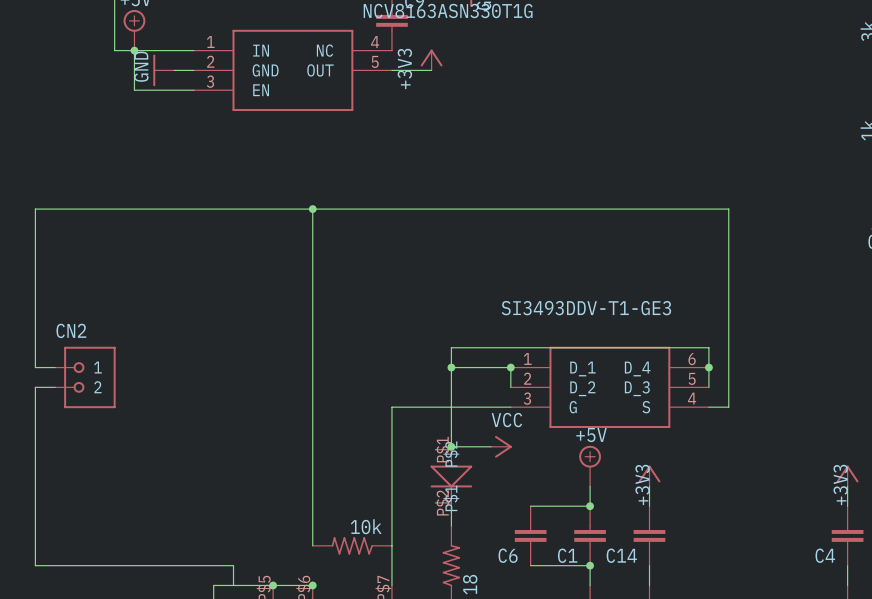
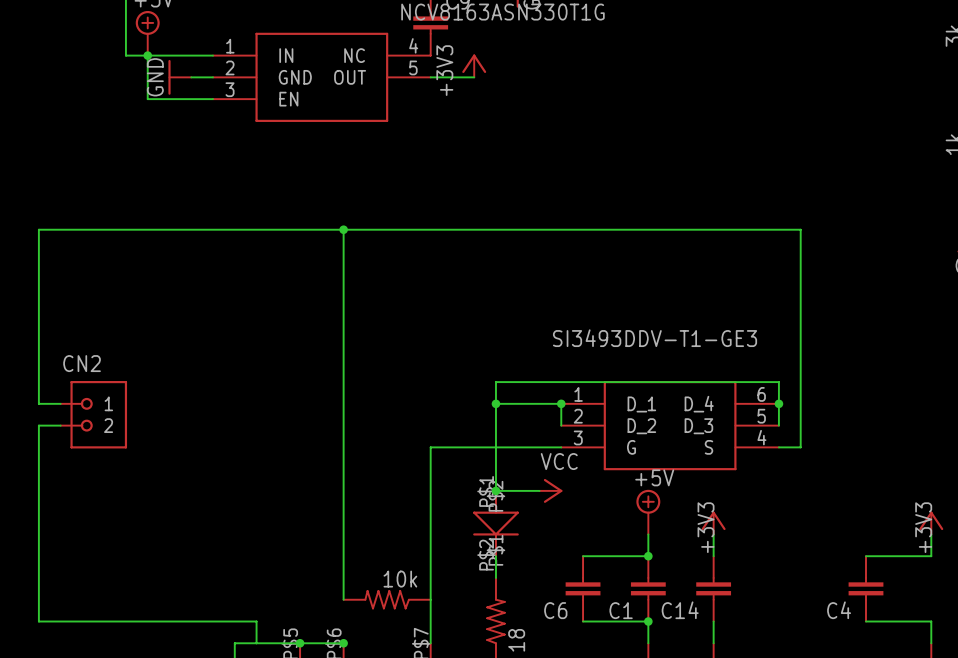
wire: none -> (866, 556) (931, 556)
C4 position: (847, 535) -> (866, 588)
wire: none -> (866, 621) (931, 621)

